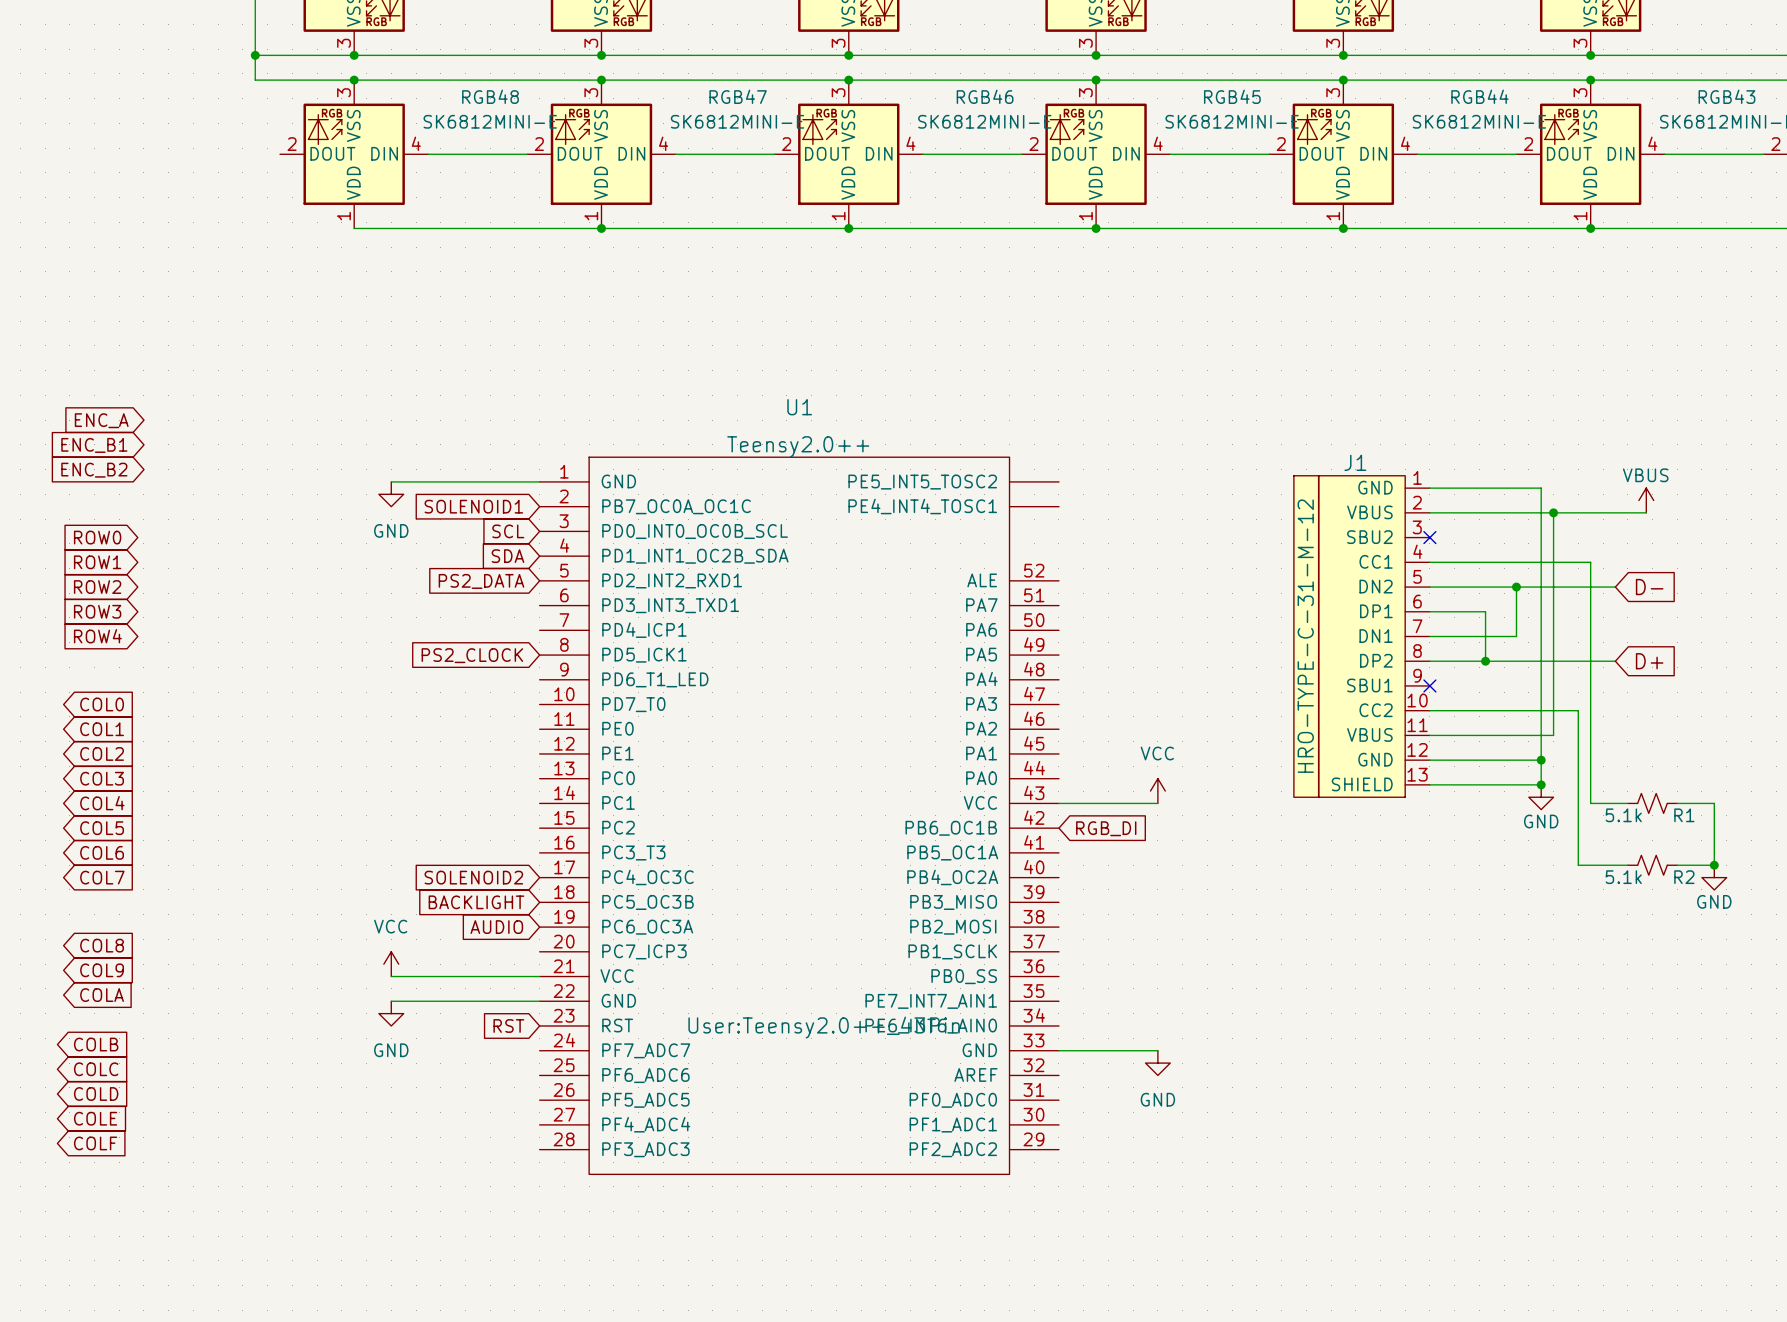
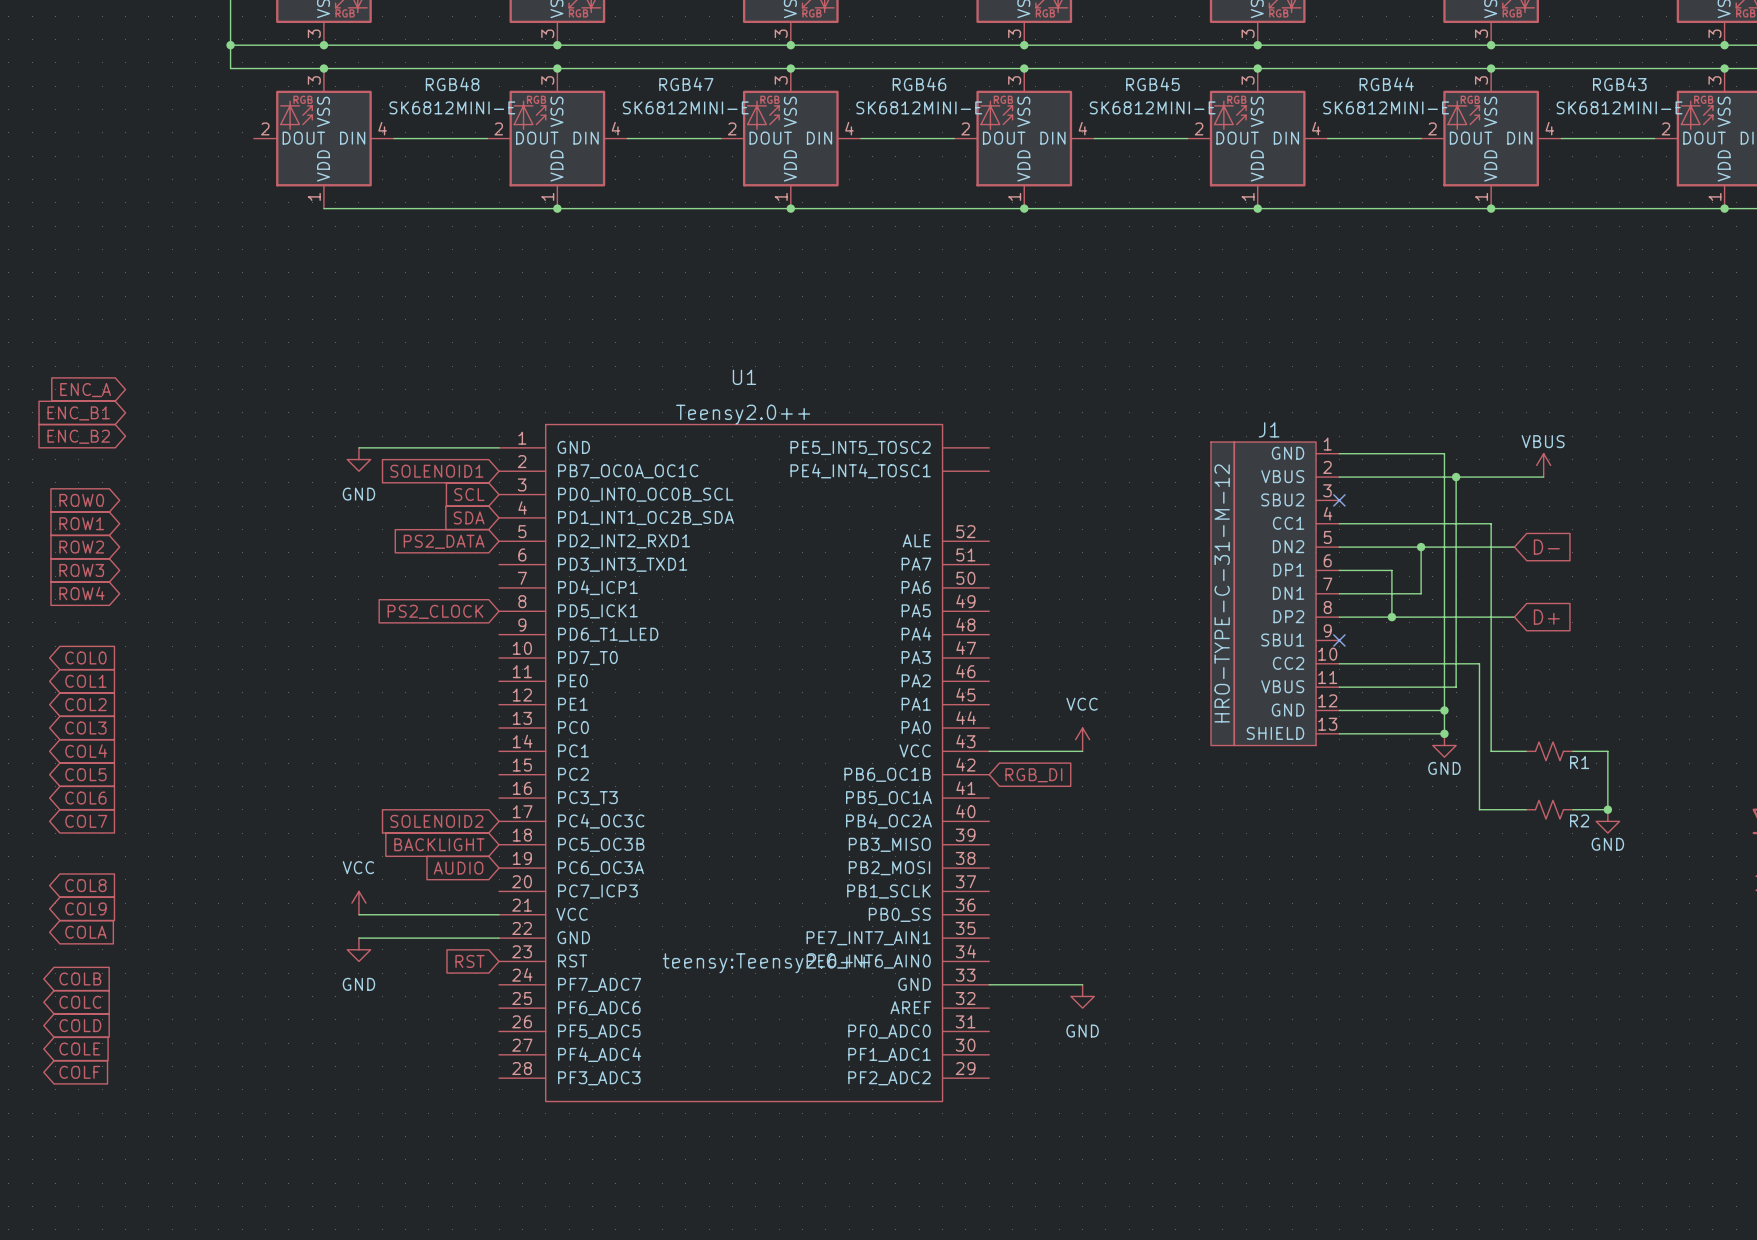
R1 value: 5.1k (1623, 815) -> none
R2 value: 5.1k (1623, 877) -> none
U1 text: User:Teensy2.0++_43Pin (824, 1027) -> teensy:Teensy2.0++ (766, 963)

